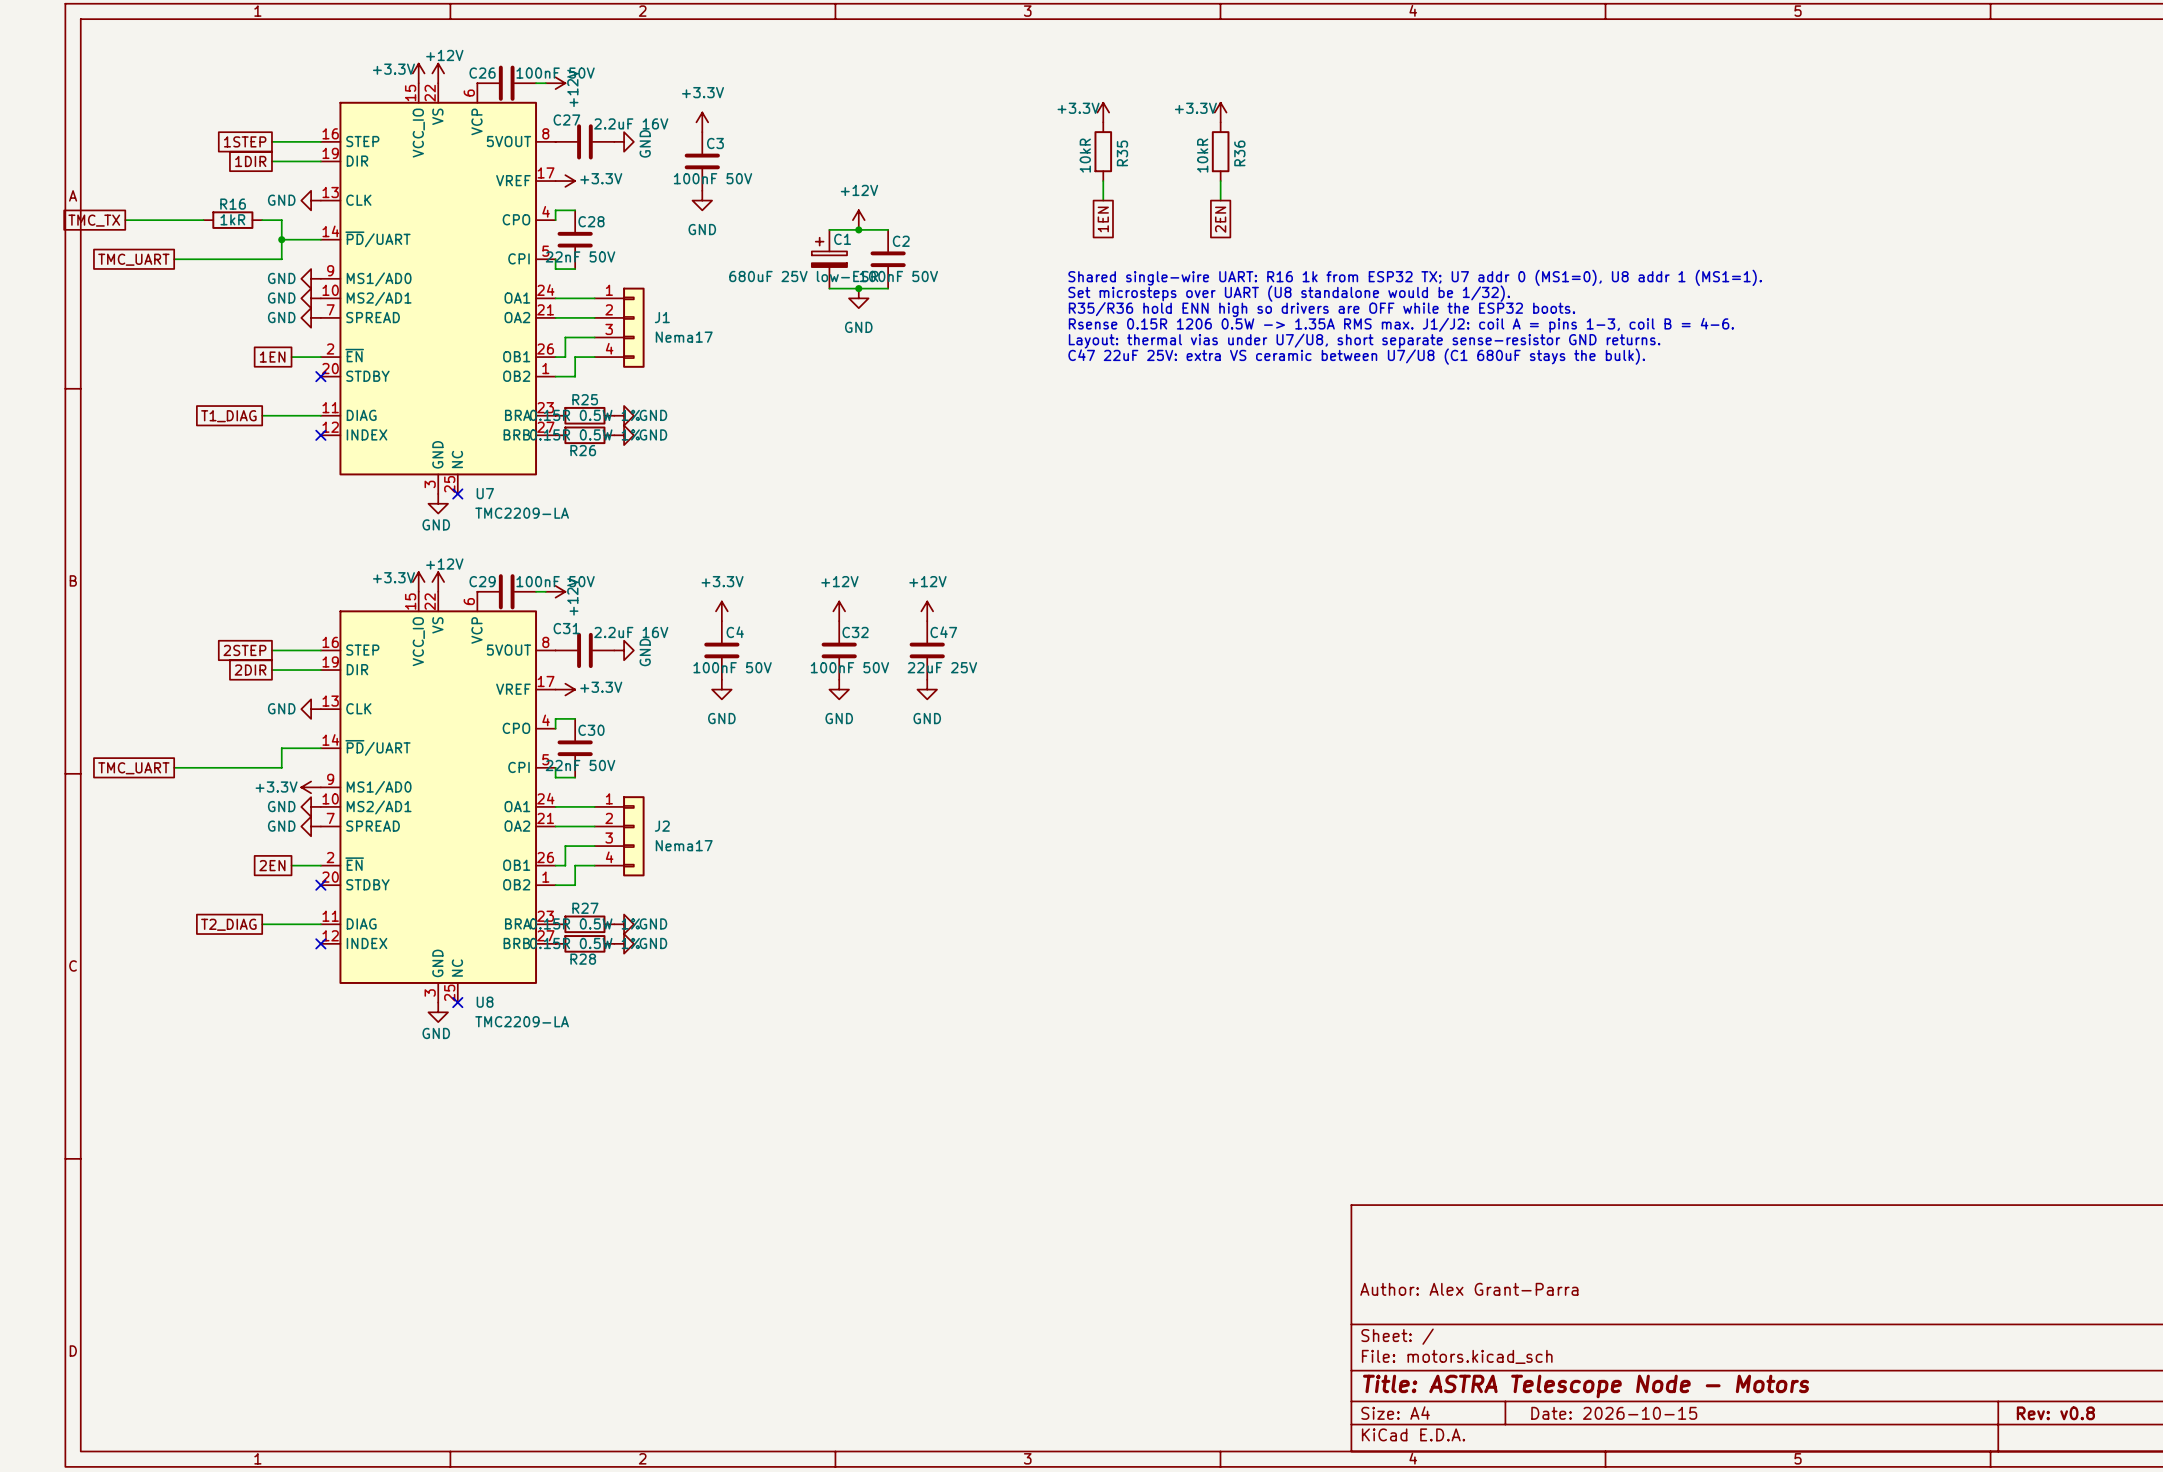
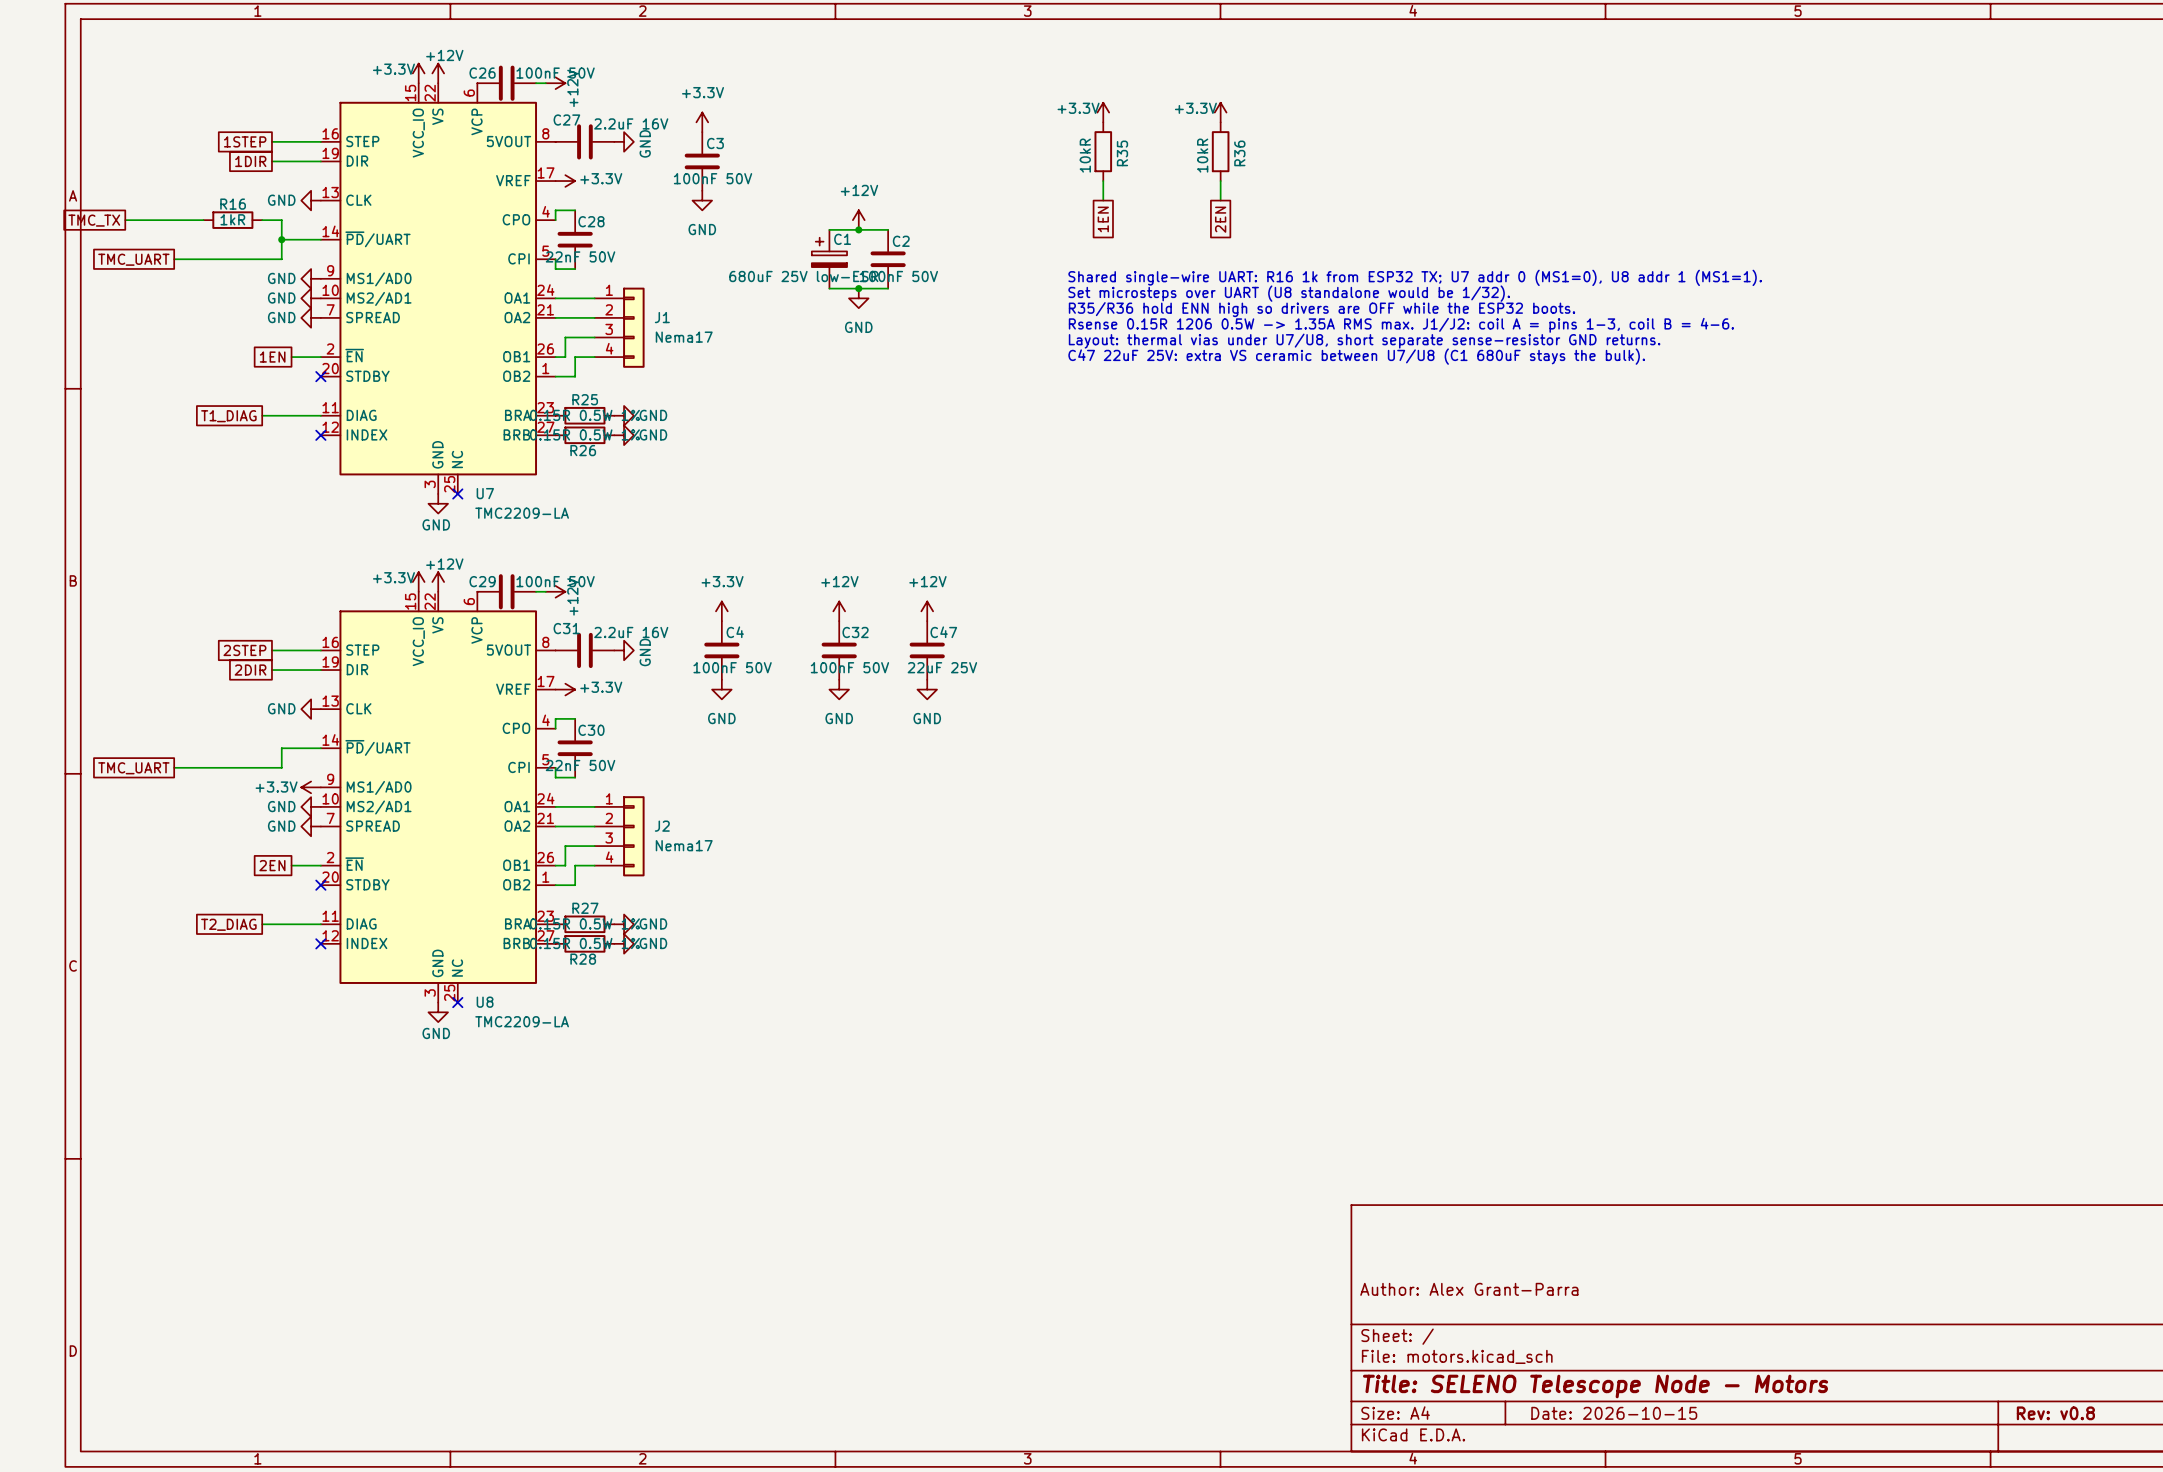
title block: Title: ASTRA Telescope Node - Motors (1586, 1386) -> Title: SELENO Telescope Node - Motors (1595, 1386)

